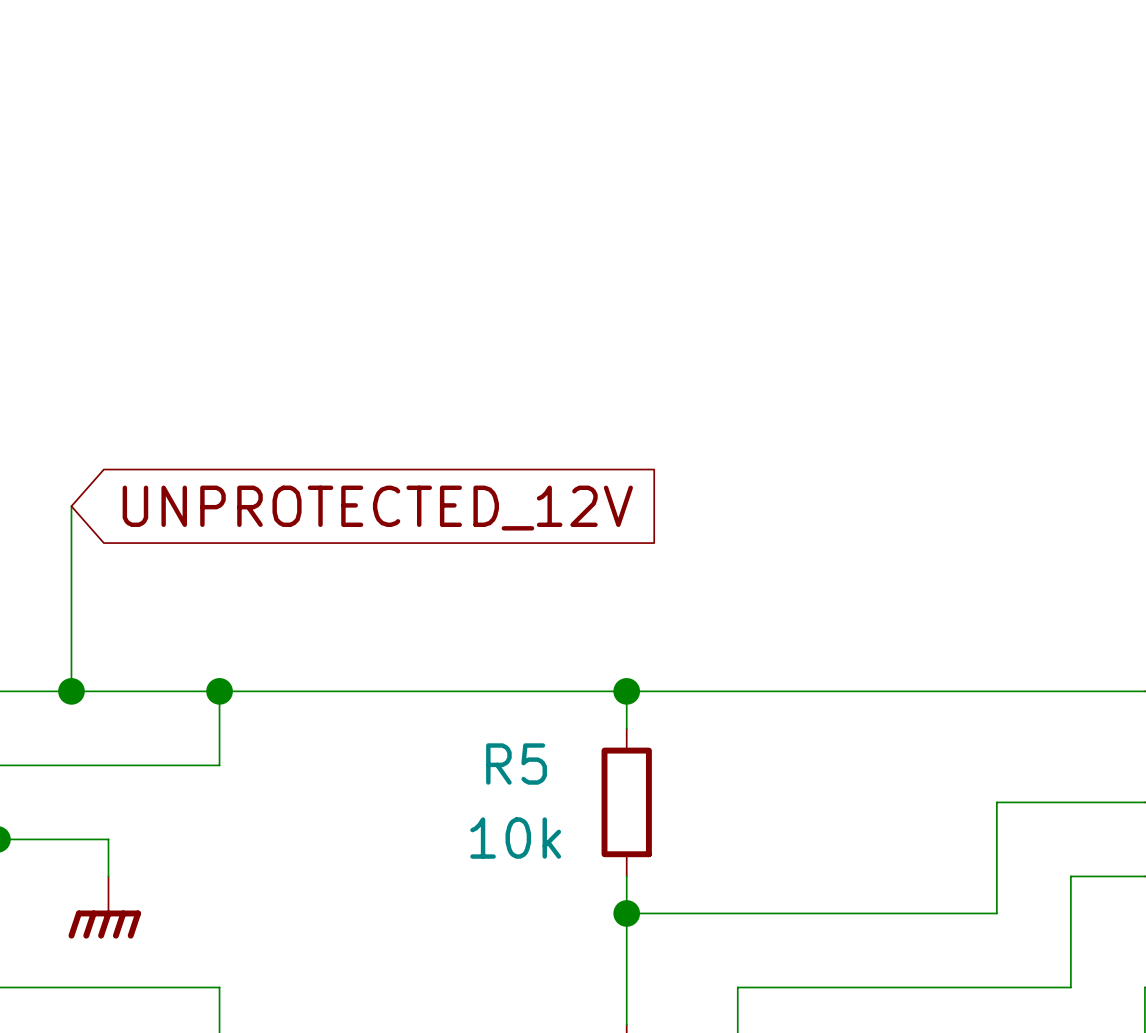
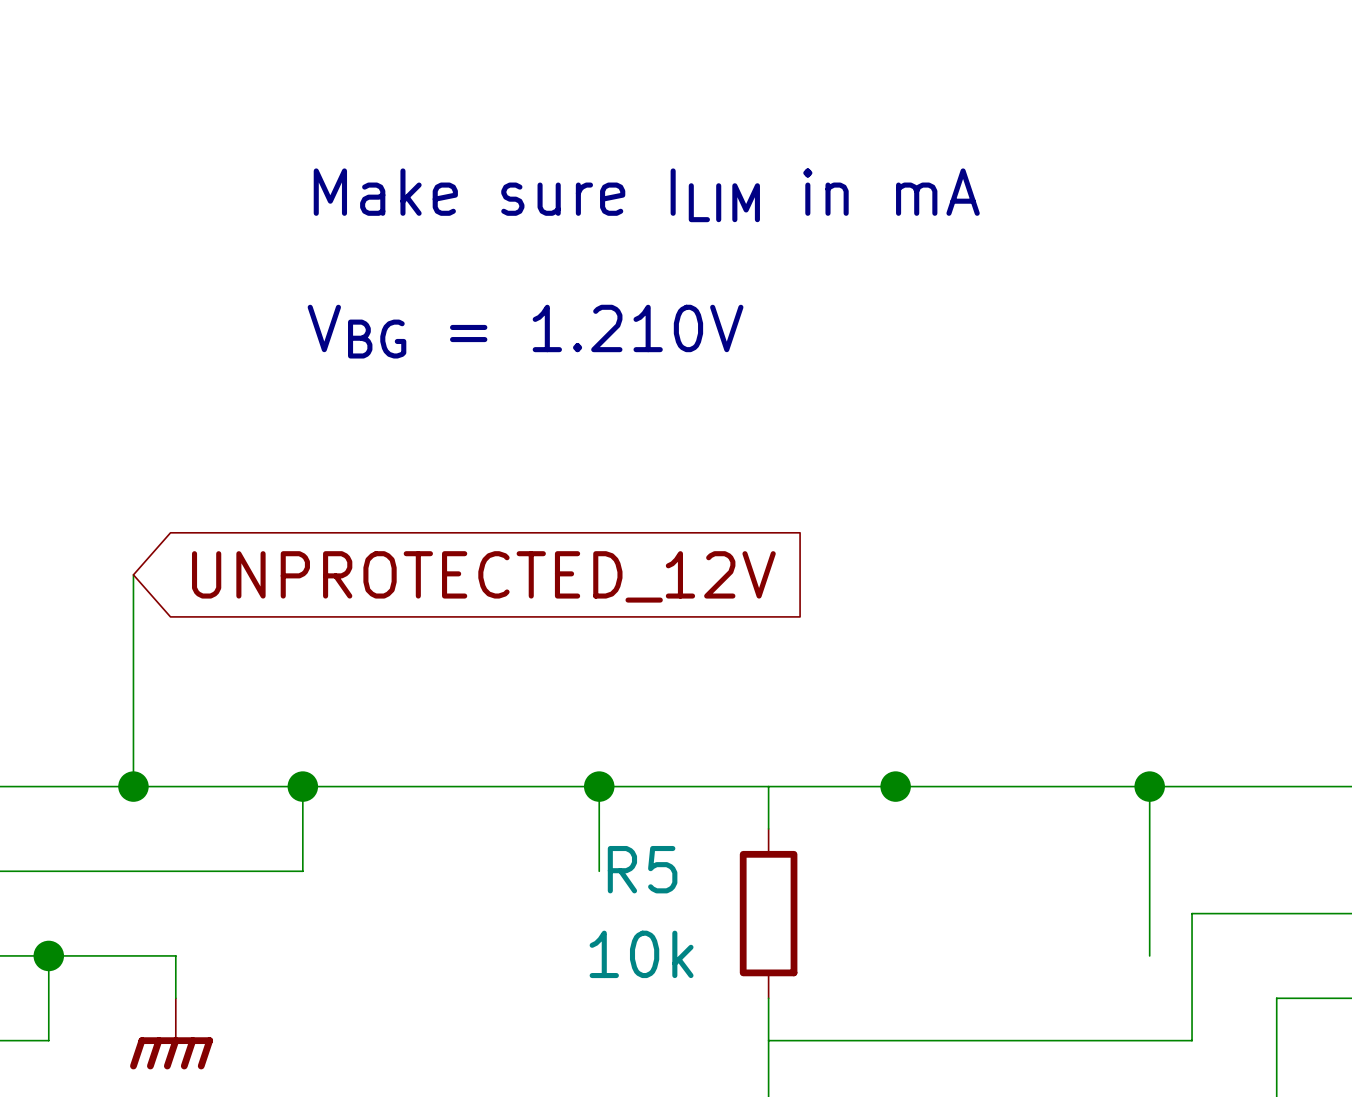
text: none -> Make sure ILIM in mA (646, 195)
text: none -> VBG = 1.210V (525, 331)
wire: none -> (599, 786) (599, 871)
junction: none -> (599, 786)
junction: (626, 691) -> none
junction: none -> (895, 786)
wire: none -> (1149, 786) (1149, 955)
junction: none -> (1149, 786)
junction: (626, 913) -> none

